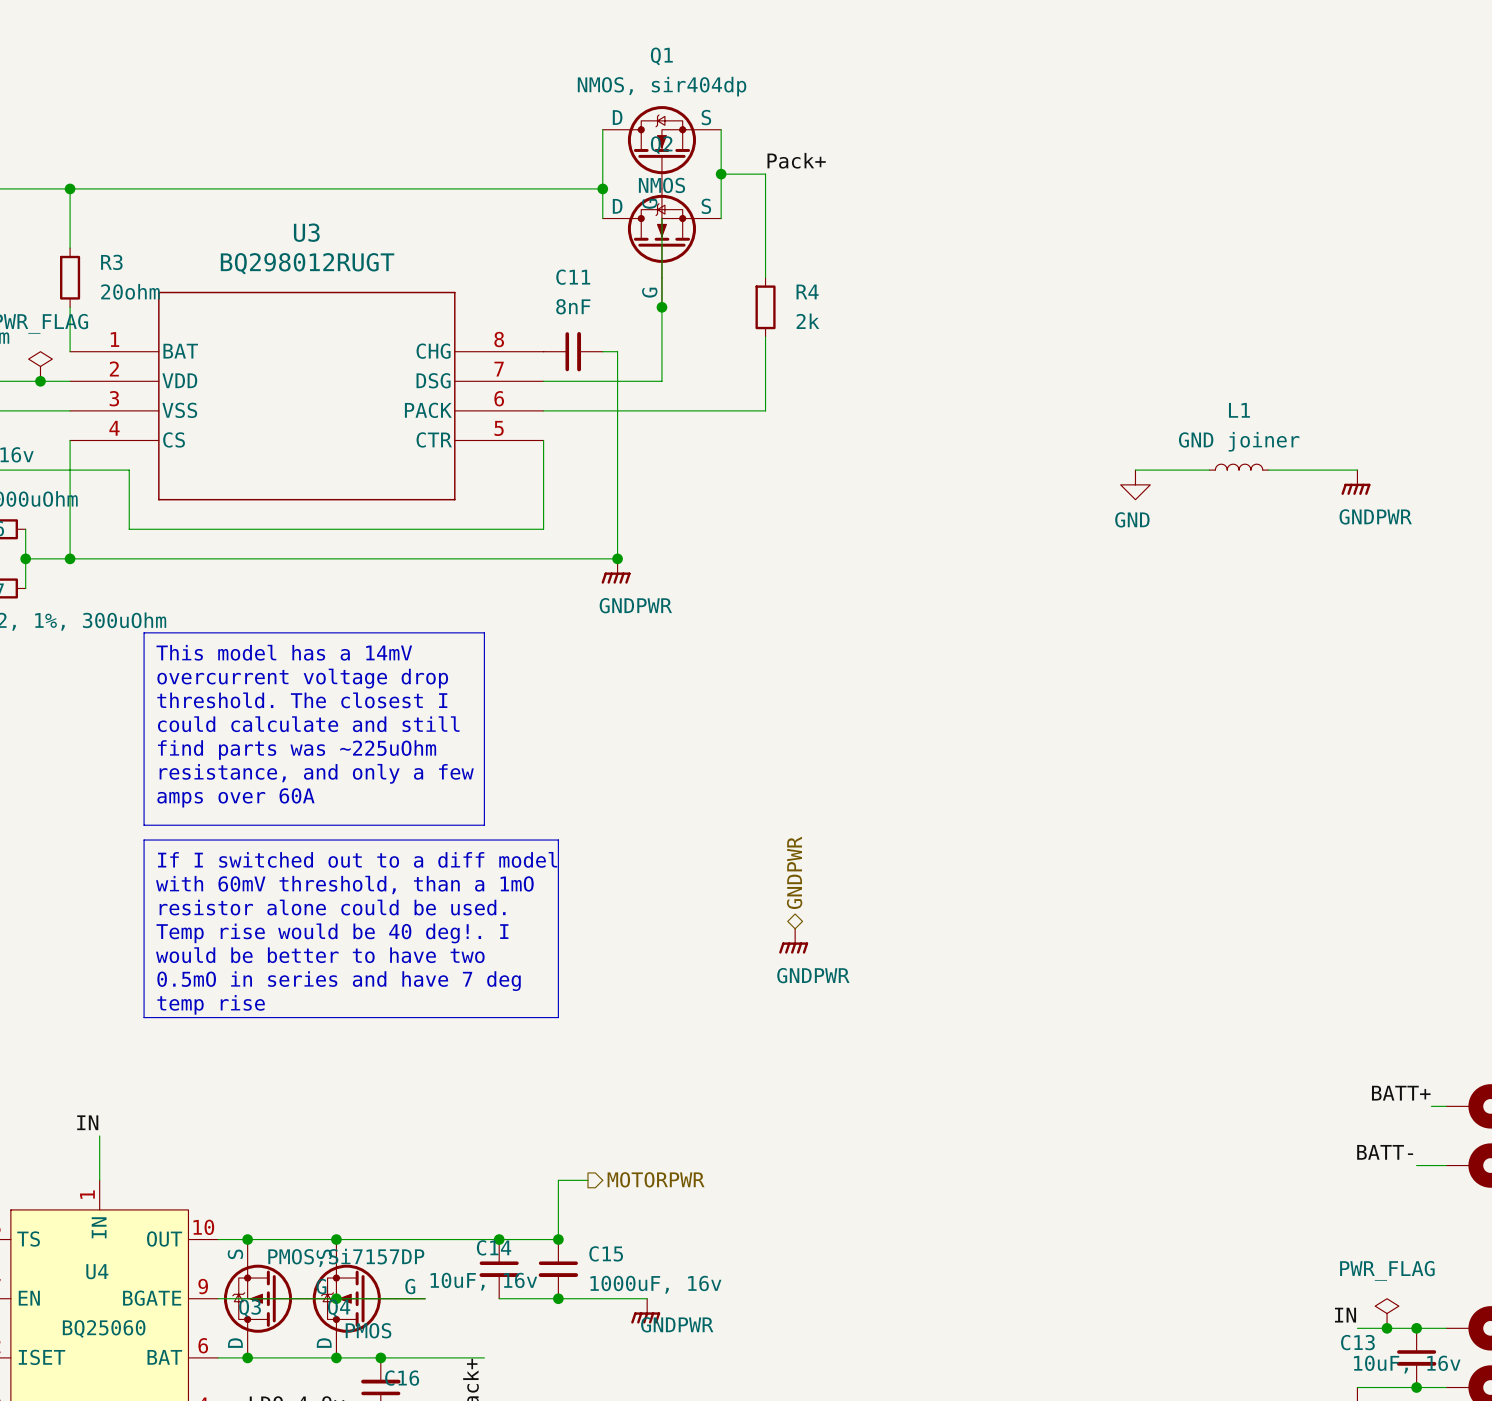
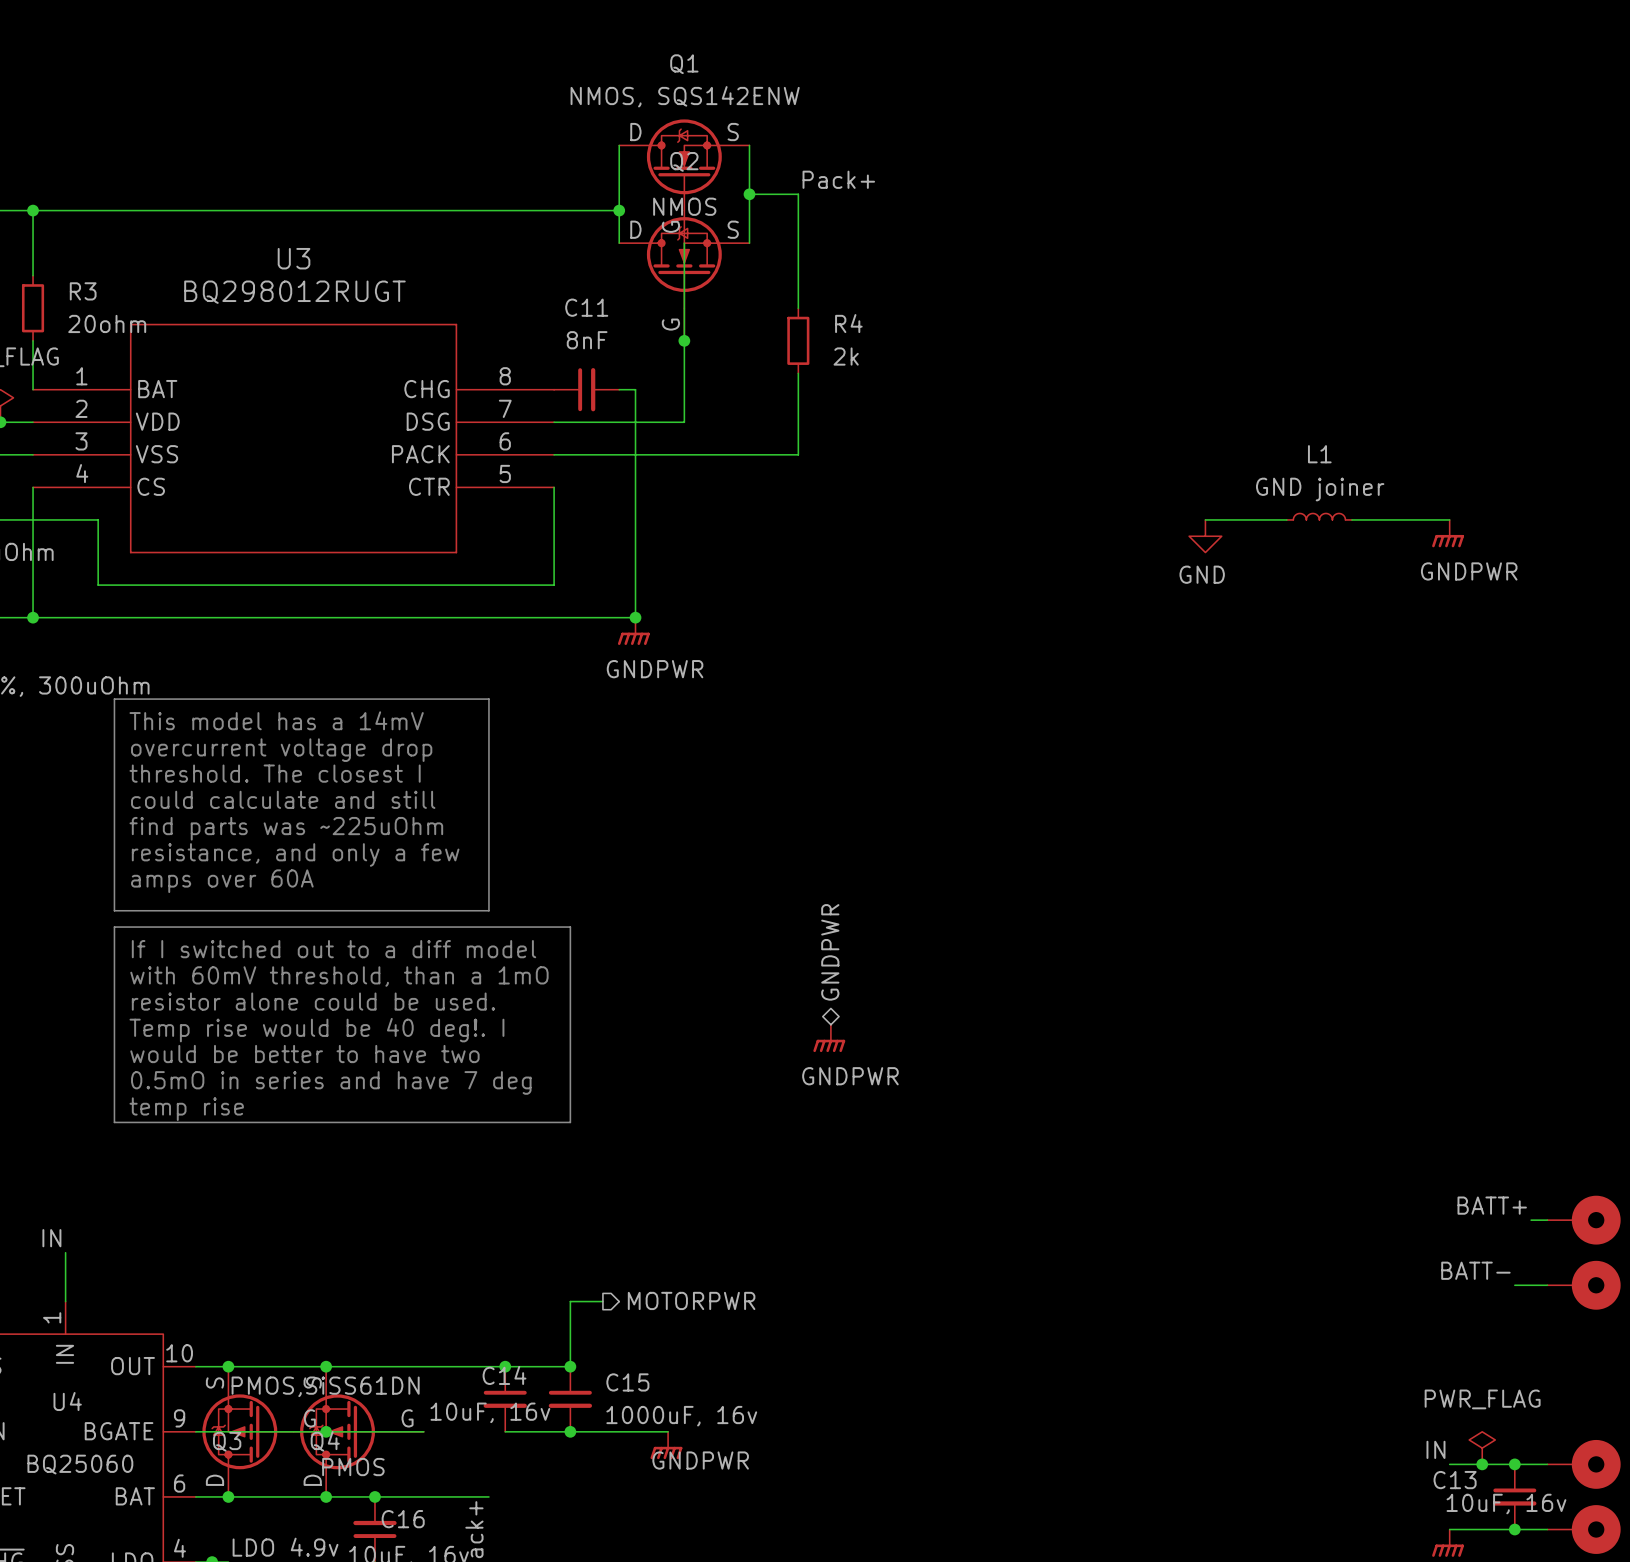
Q1 value: NMOS, sir404dp (662, 86) -> NMOS, SQS142ENW (685, 96)
Q3 value: PMOS,Si7157DP (346, 1257) -> PMOS,SiSS61DN (325, 1386)

